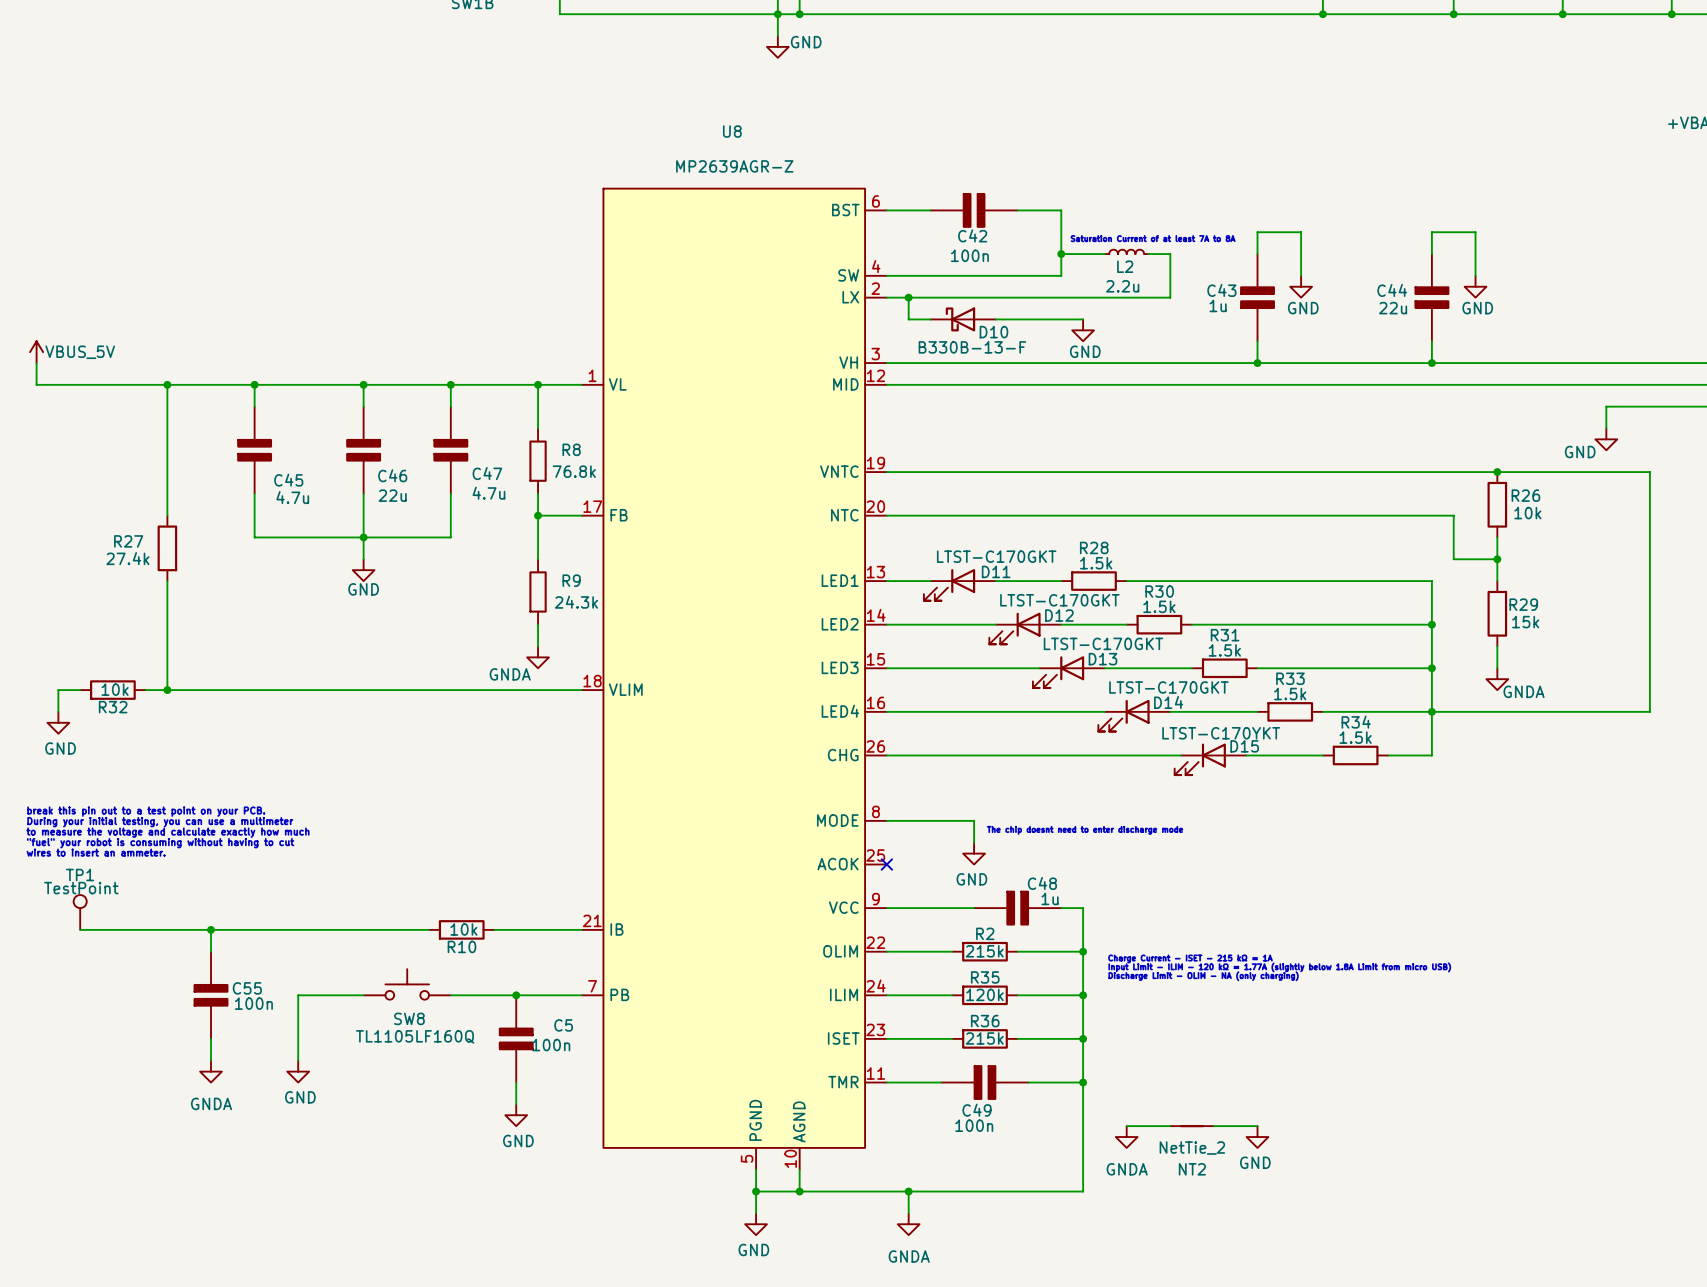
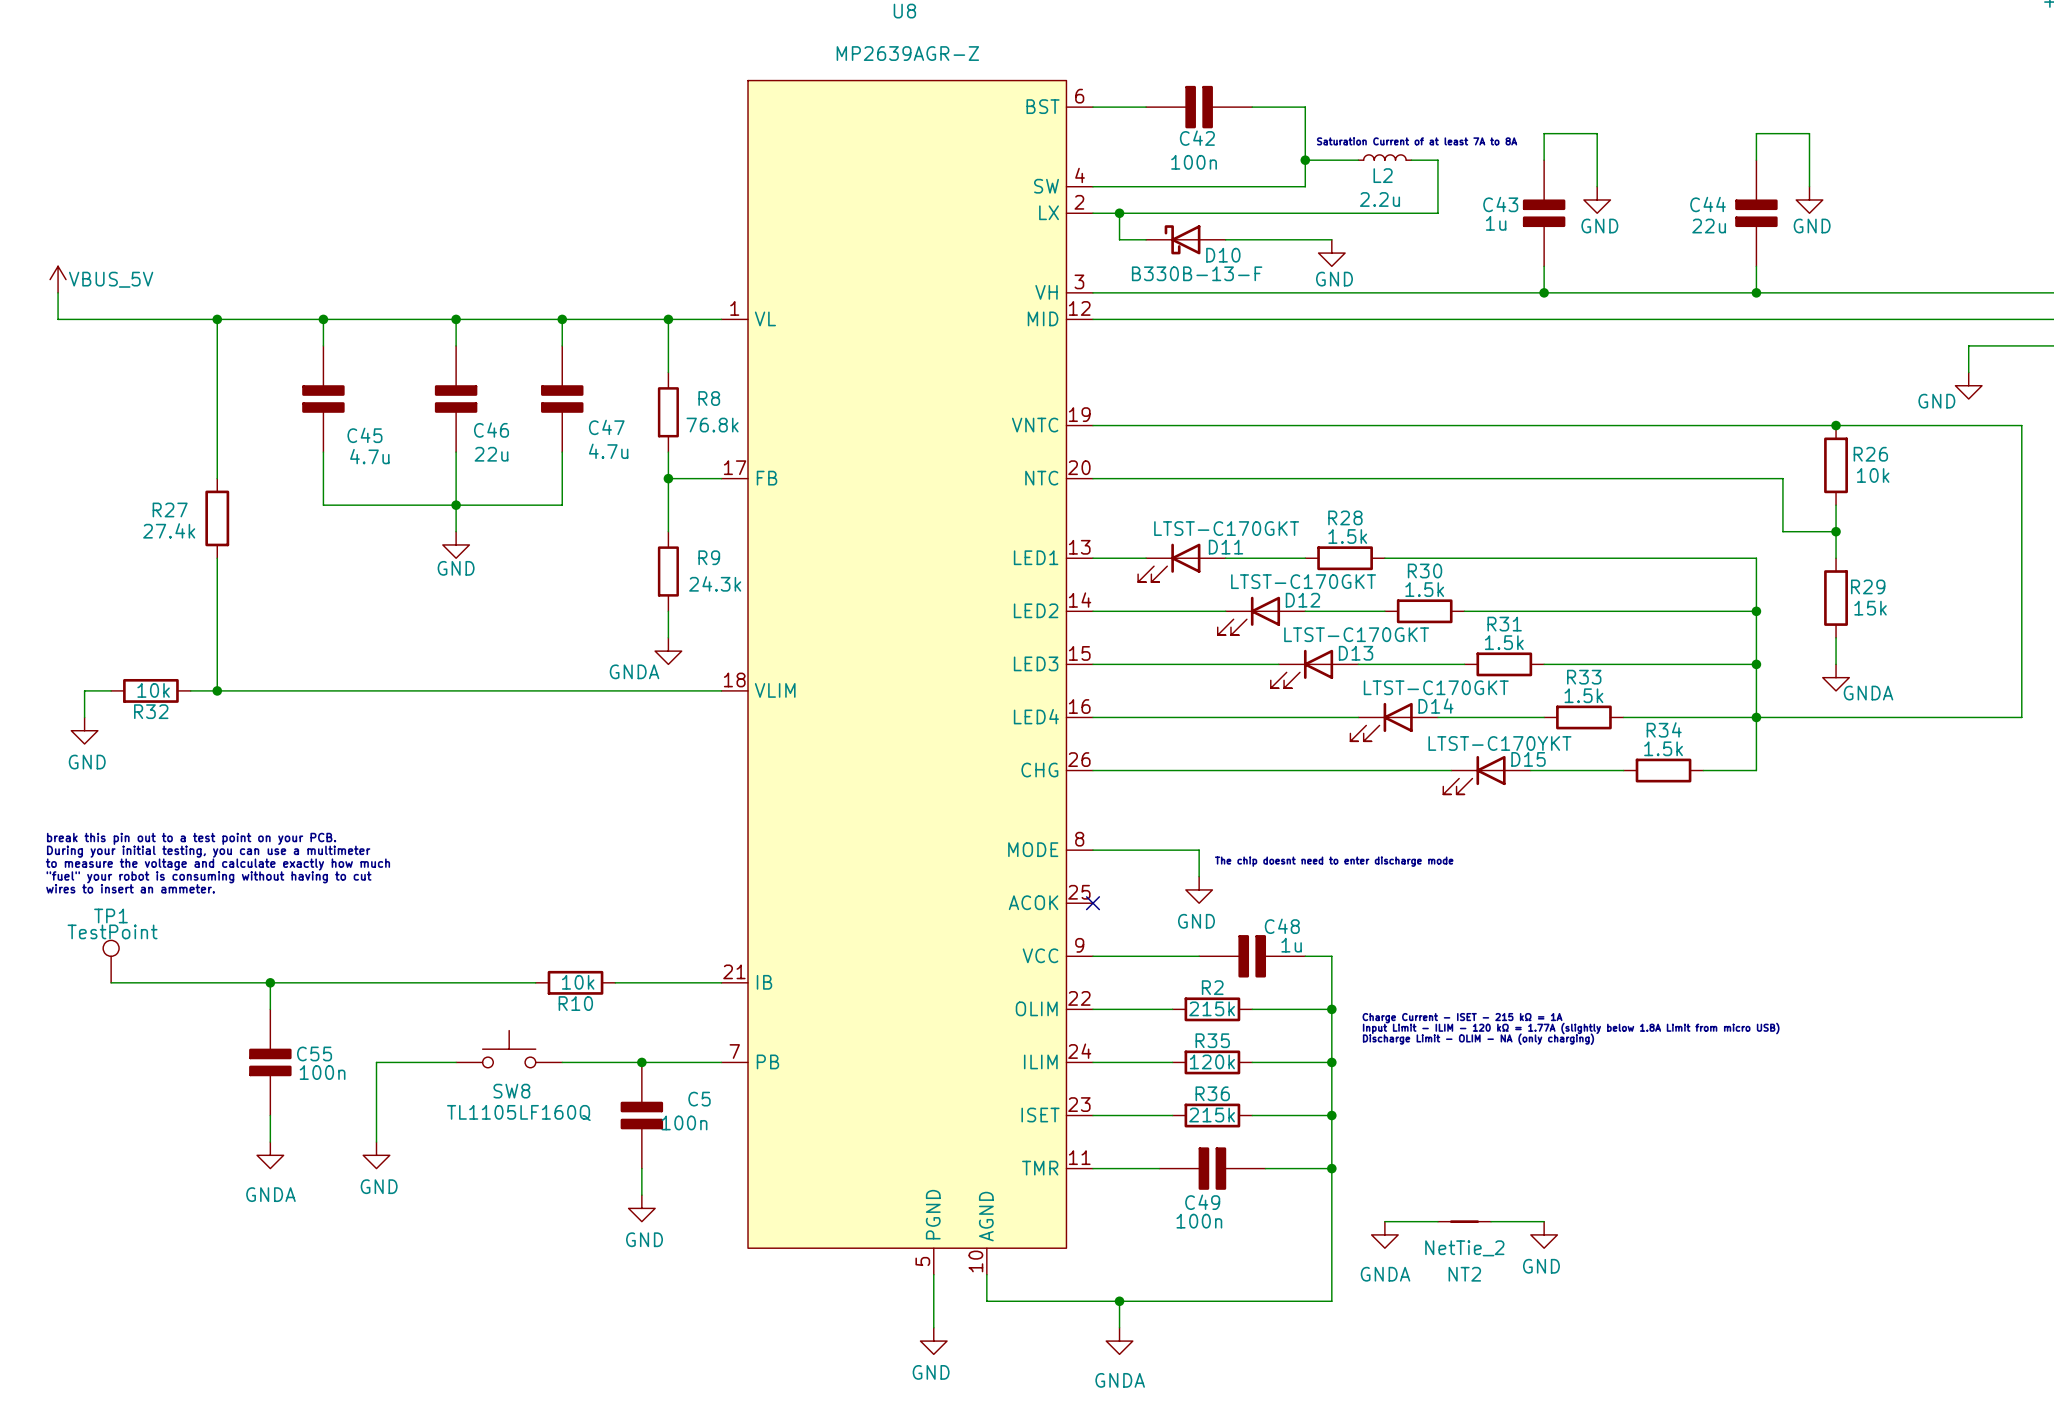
wire: (756, 1191) (799, 1191) -> none
junction: (756, 1191) -> none
junction: (799, 1191) -> none

